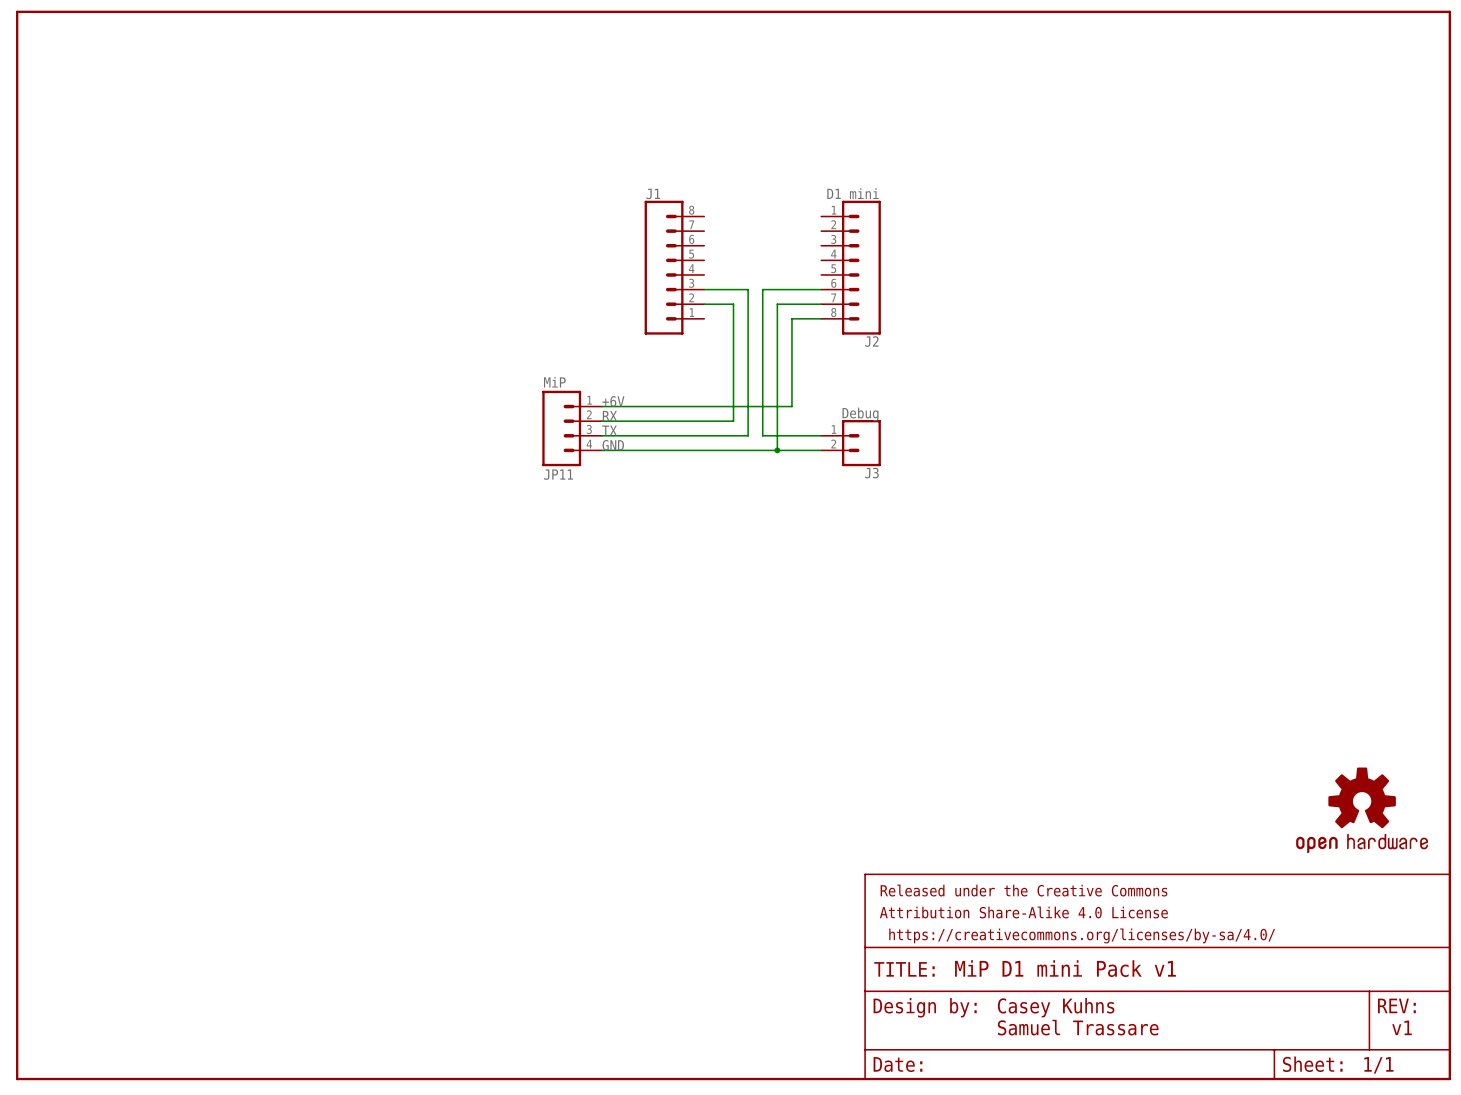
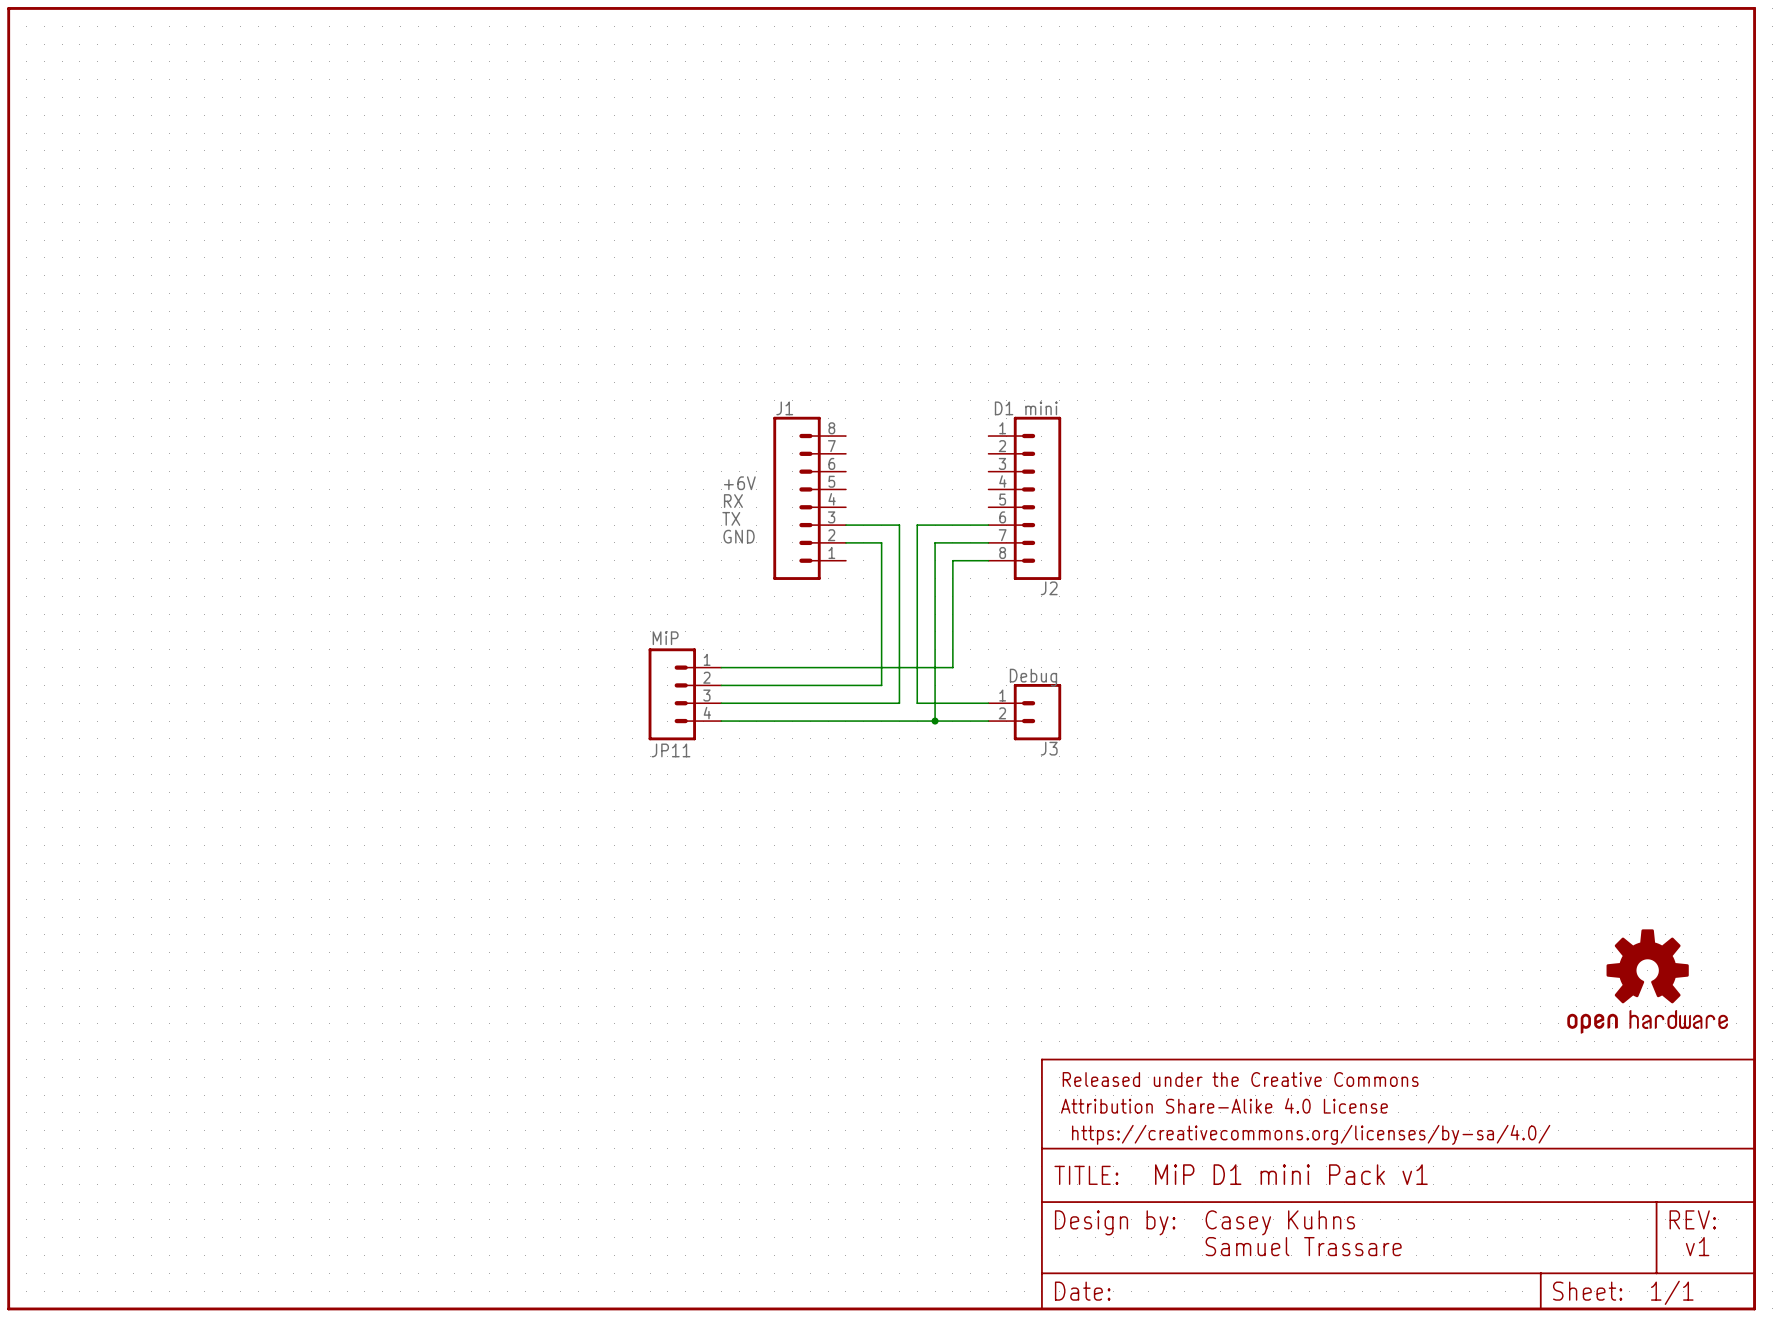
J1 position: (674, 267) -> (809, 498)
J2 position: (851, 267) -> (1024, 498)
wire: (704, 289) (748, 289) (748, 435) -> (721, 703) (899, 703) (899, 525)
wire: (821, 289) (762, 289) (762, 435) -> (988, 703) (917, 703) (917, 525)
wire: (704, 304) (733, 304) (733, 421) (601, 421) -> none
wire: (821, 304) (777, 304) (777, 450) (733, 450) -> (721, 685) (881, 685) (881, 542)
wire: (821, 318) (791, 318) (791, 406) (601, 406) -> none
JP11 position: (572, 428) -> (684, 694)
wire: (601, 435) (704, 435) -> none
J3 position: (851, 443) -> (1024, 712)
wire: (601, 450) (704, 450) -> none
wire: none -> (935, 542) (935, 721)
junction: (777, 450) -> none
wire: none -> (988, 560) (952, 560) (952, 667) (721, 667)
wire: none -> (721, 721) (988, 721)
junction: none -> (935, 721)

